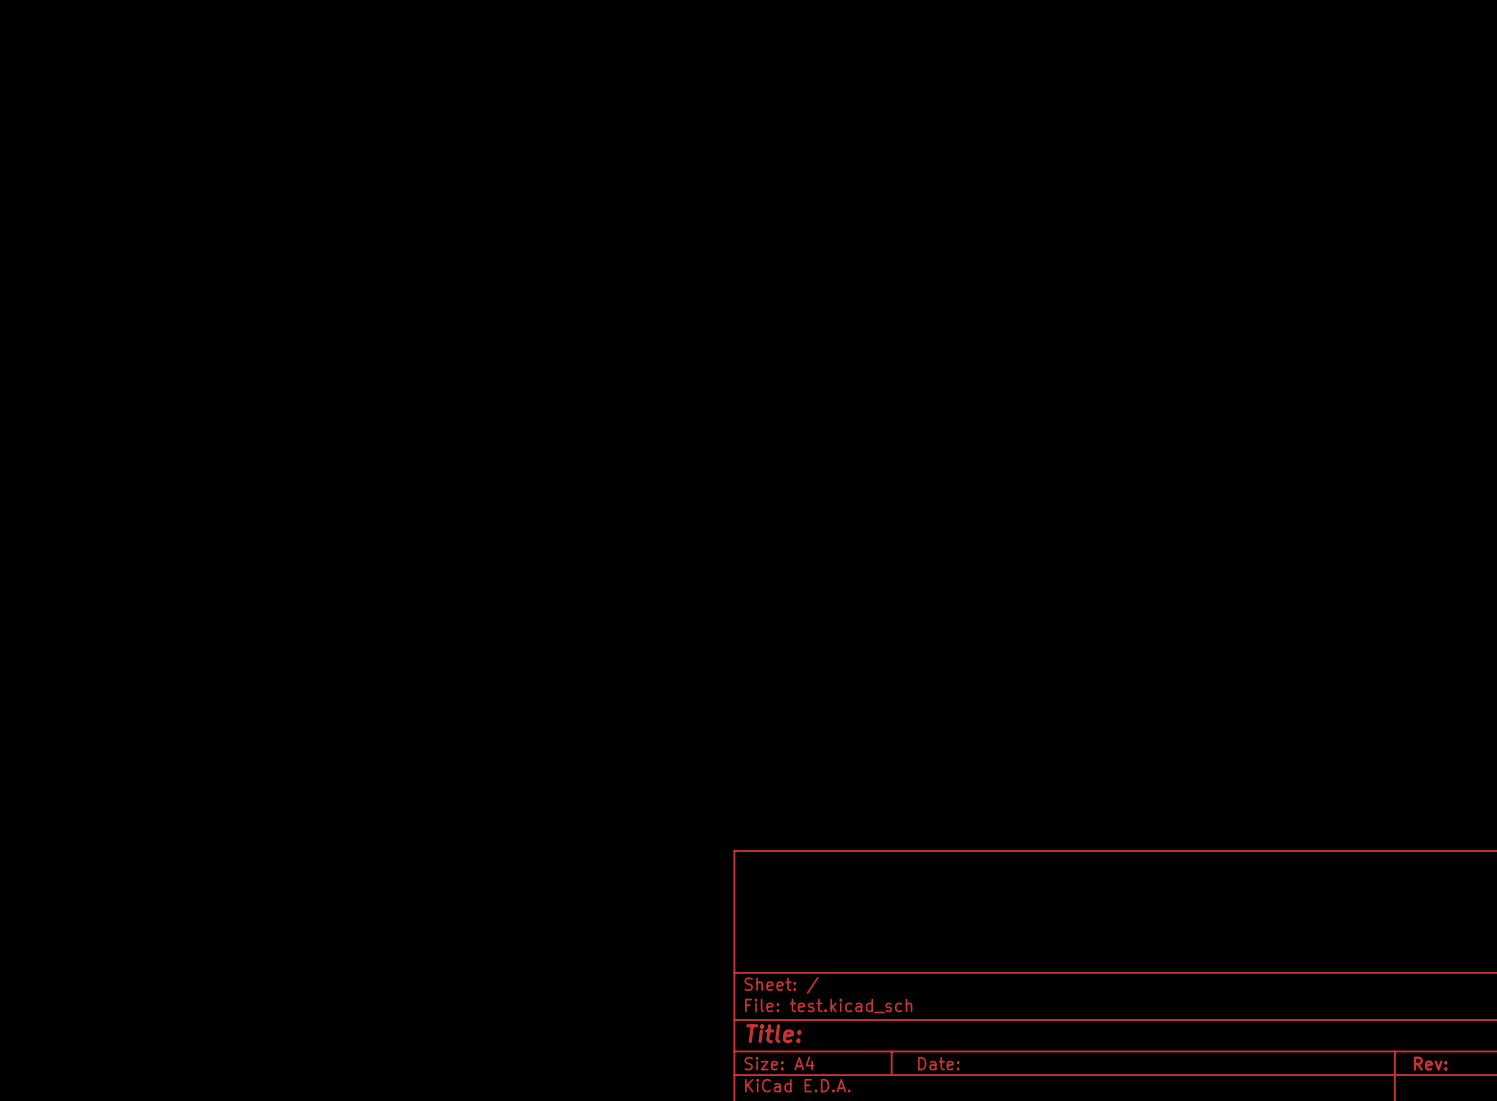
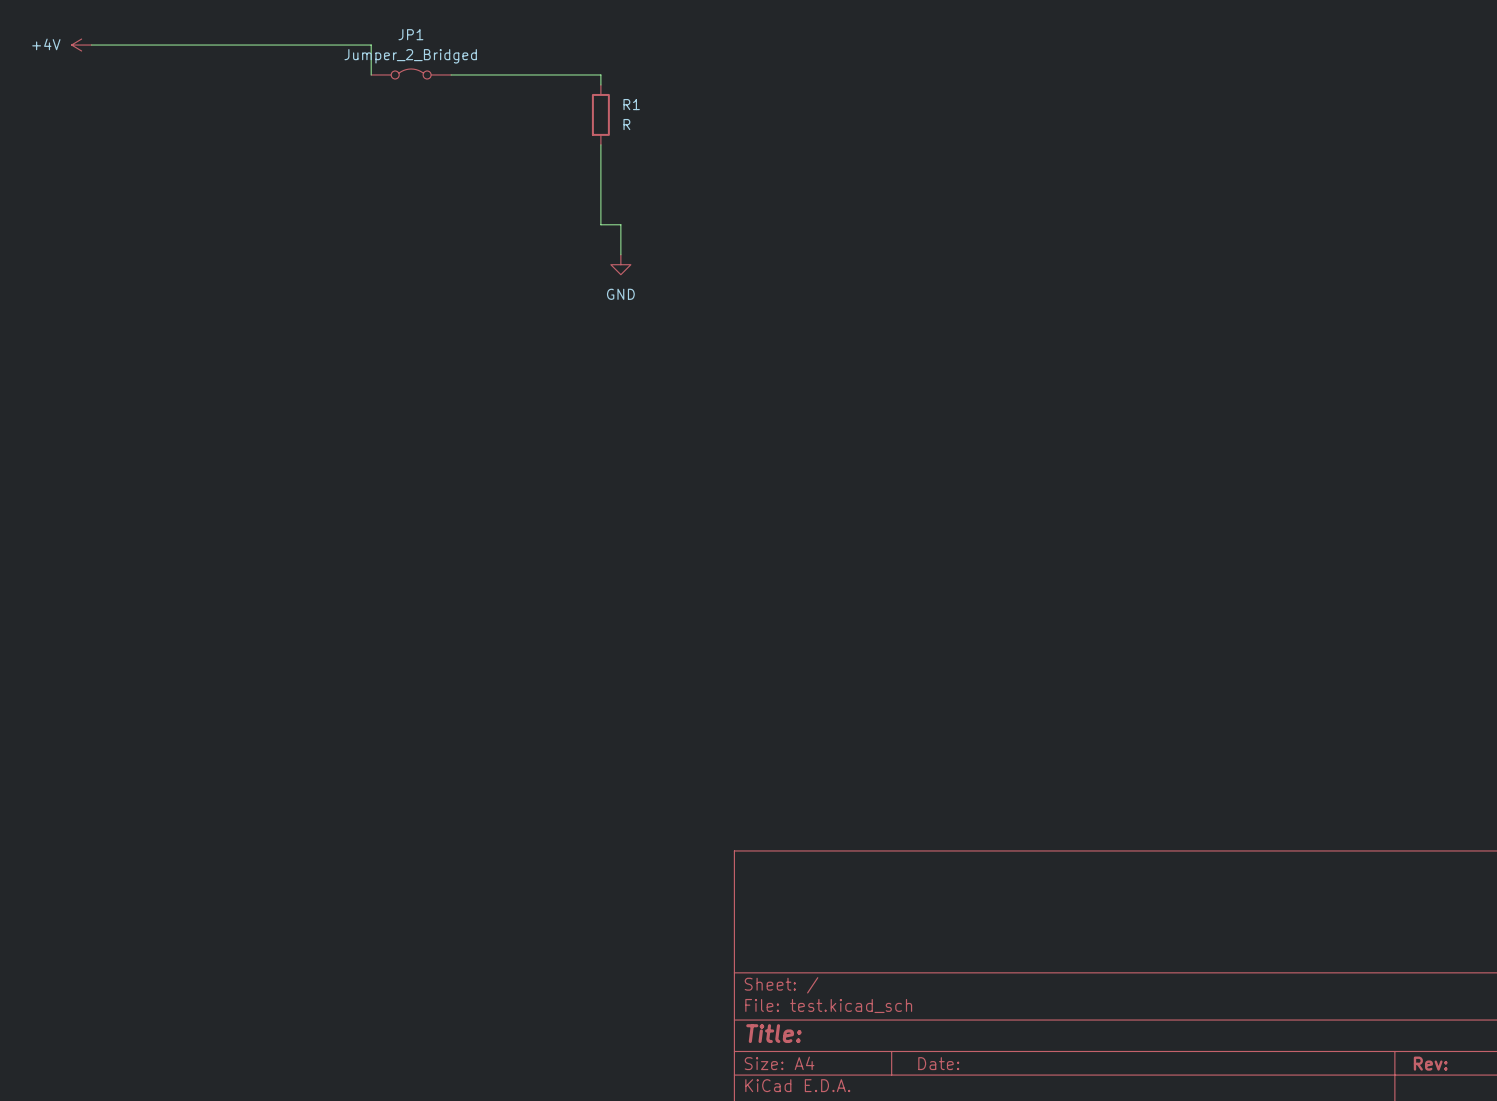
power symbol: none -> +4V (81, 45)
wire: none -> (91, 45) (371, 45) (371, 74)
JP1: none -> Jumper_2_Bridged (411, 73)
wire: none -> (451, 74) (600, 74) (600, 84)
R1: none -> R (600, 114)
wire: none -> (600, 144) (600, 224) (620, 224) (620, 254)
power symbol: none -> GND (620, 264)

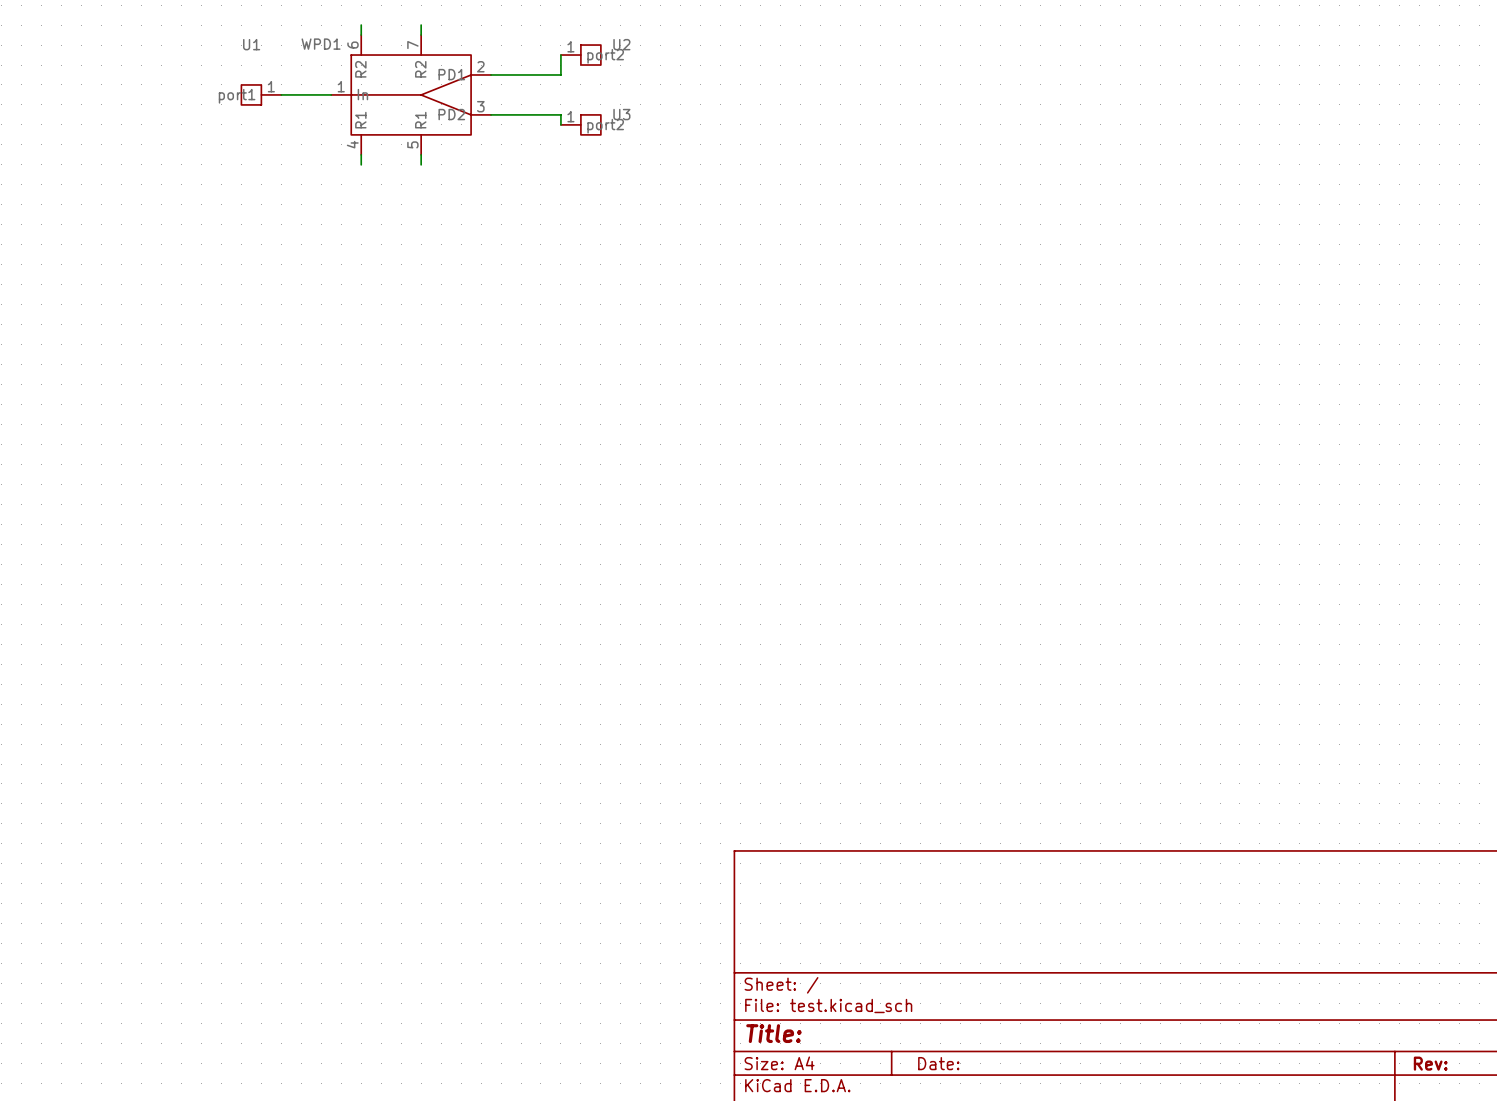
wire: none -> (361, 25) (361, 35)
wire: none -> (421, 25) (421, 35)
power symbol: +4V (81, 45) -> none
wire: (91, 45) (371, 45) (371, 74) -> none
U2: none -> (580, 55)
JP1: Jumper_2_Bridged (411, 73) -> none
wire: (560, 74) (600, 74) (600, 84) -> (560, 74) (560, 55)
U1: none -> (261, 94)
wire: none -> (281, 94) (331, 94)
WPD1: none -> (411, 94)
wire: none -> (491, 114) (560, 114) (560, 124)
R1: R (600, 114) -> none
U3: none -> (580, 124)
wire: (600, 144) (600, 224) (620, 224) (620, 254) -> none
wire: none -> (361, 154) (361, 164)
wire: none -> (421, 154) (421, 164)
power symbol: GND (620, 264) -> none

